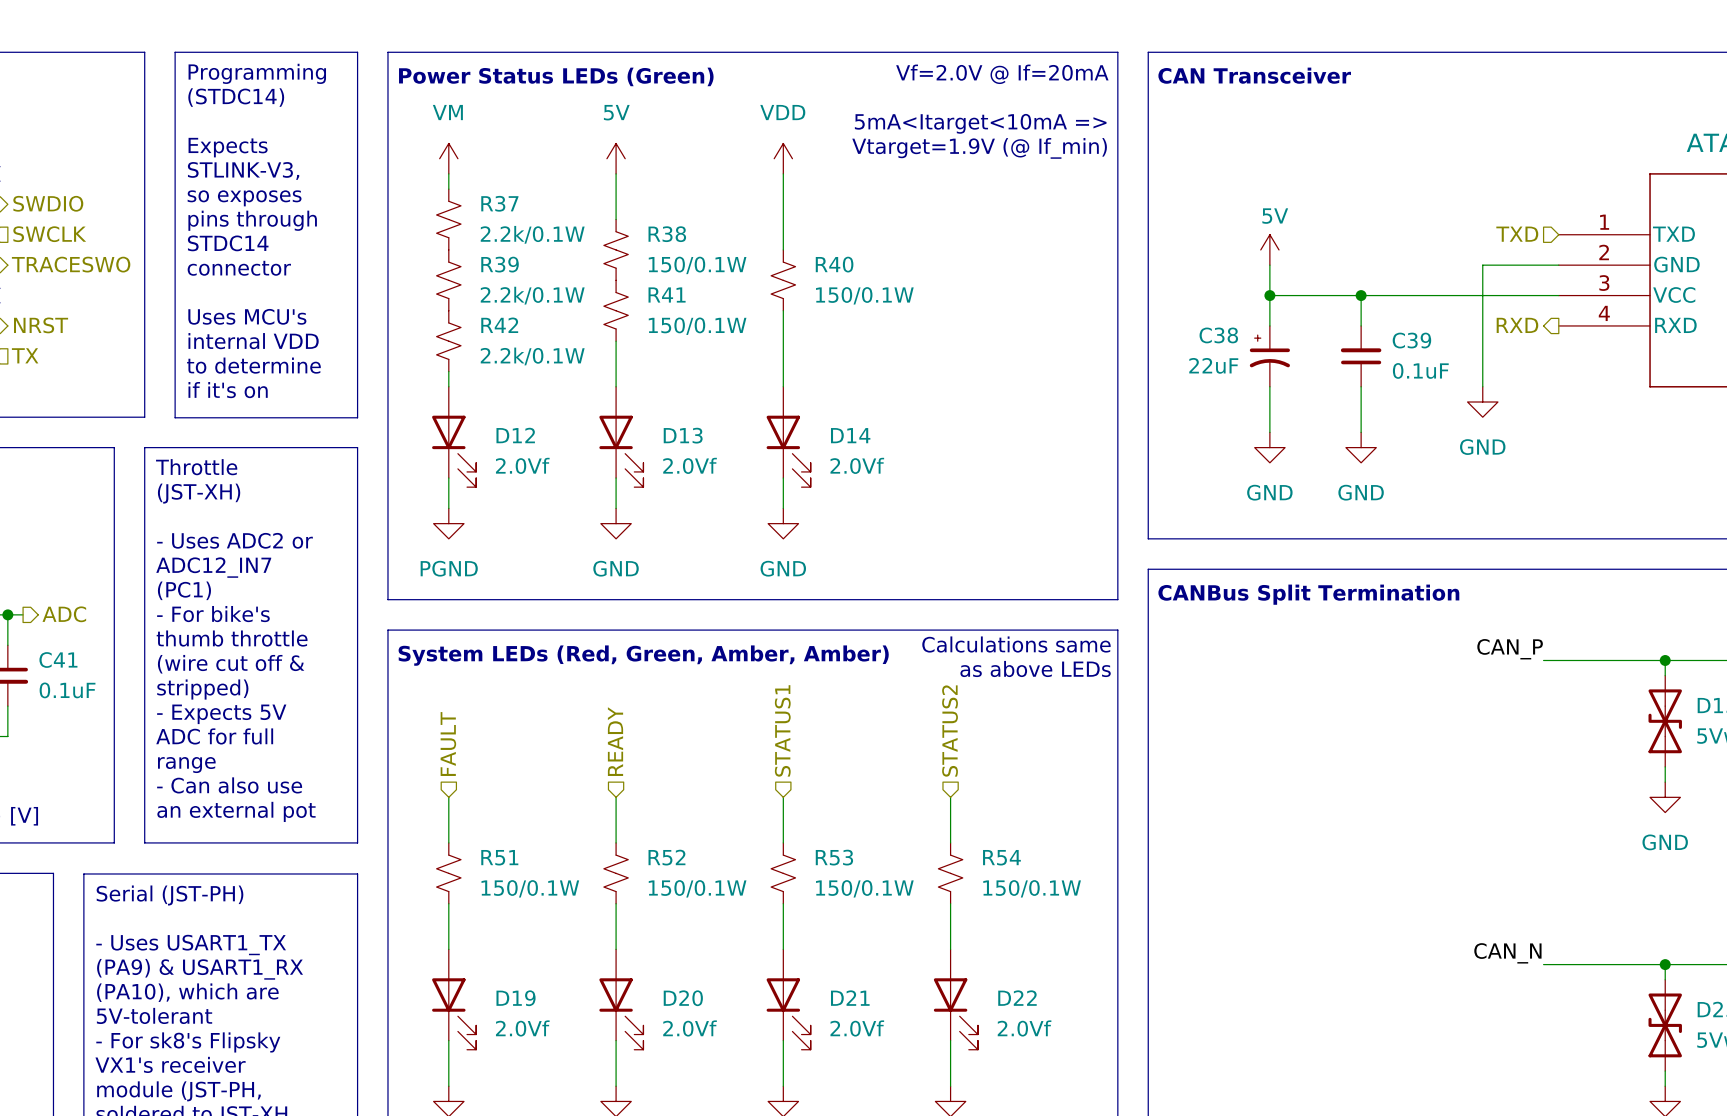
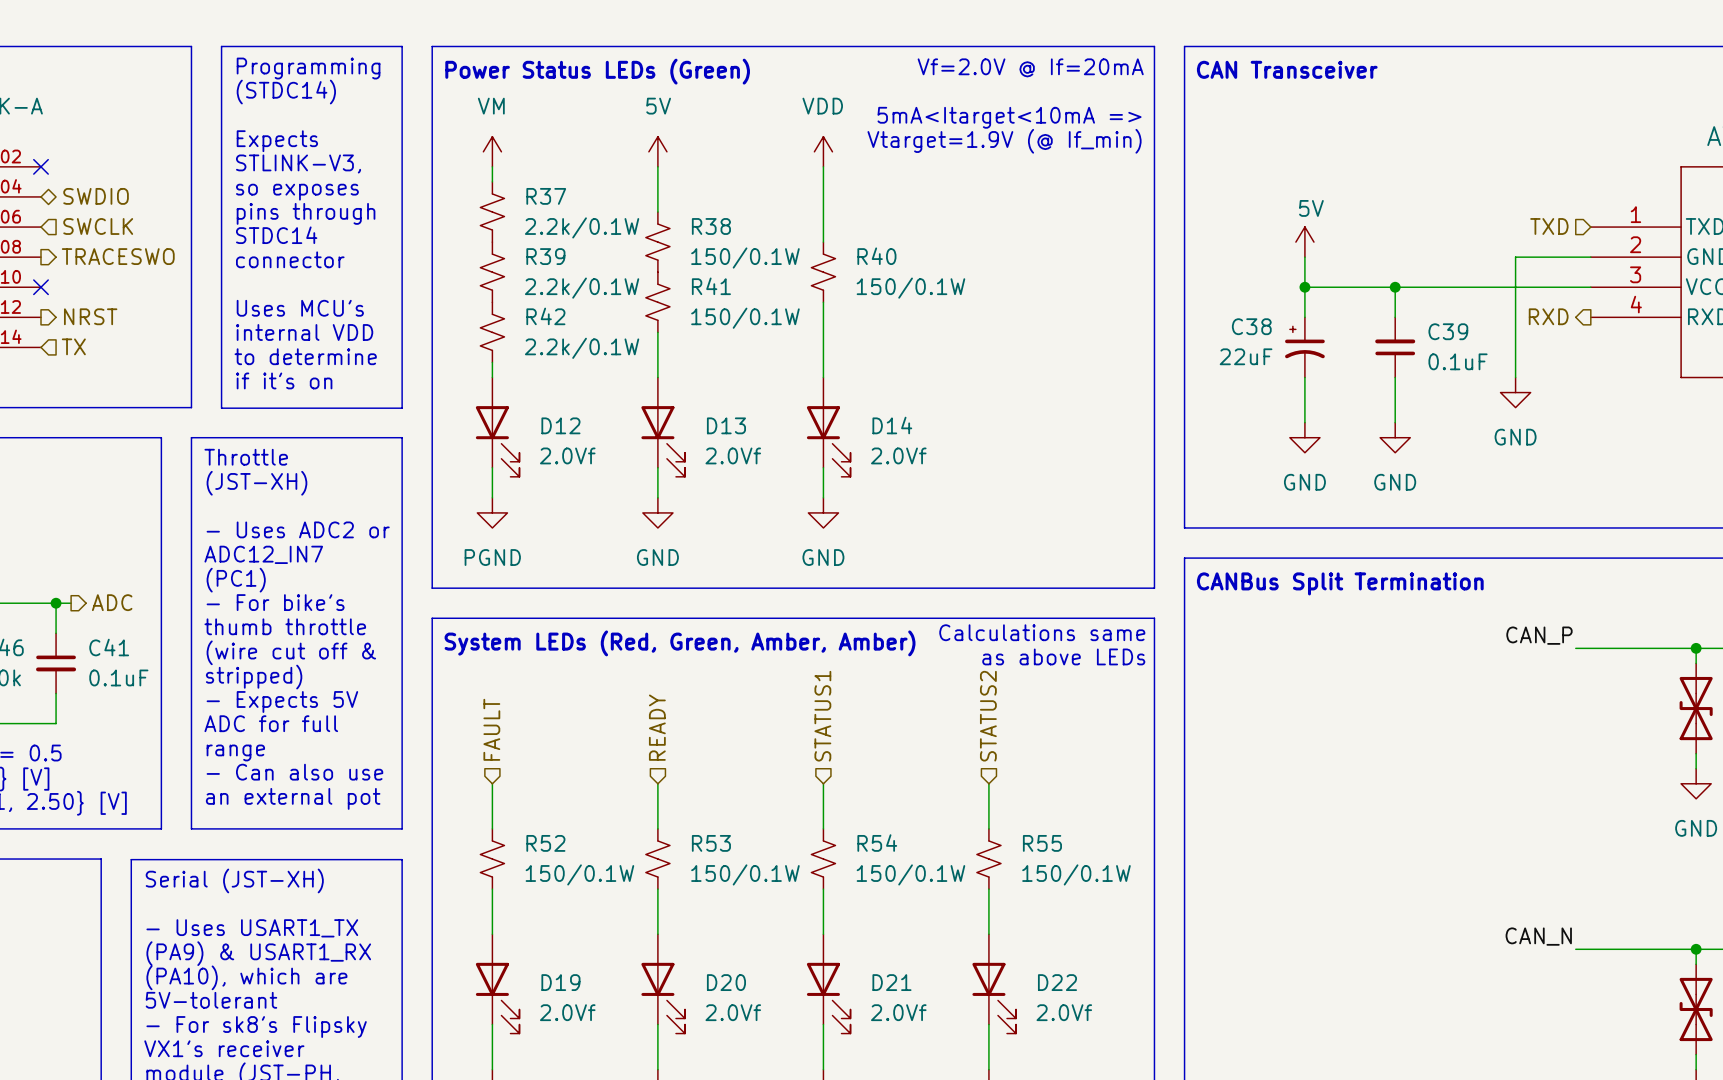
R51 name: R51 (499, 857) -> R52 (545, 843)
R52 name: R52 (666, 857) -> R53 (711, 843)
R53 name: R53 (834, 857) -> R54 (877, 843)
R54 name: R54 (1001, 857) -> R55 (1042, 843)
text: Serial (JST-PH) (169, 895) -> Serial (JST-XH) (234, 880)

